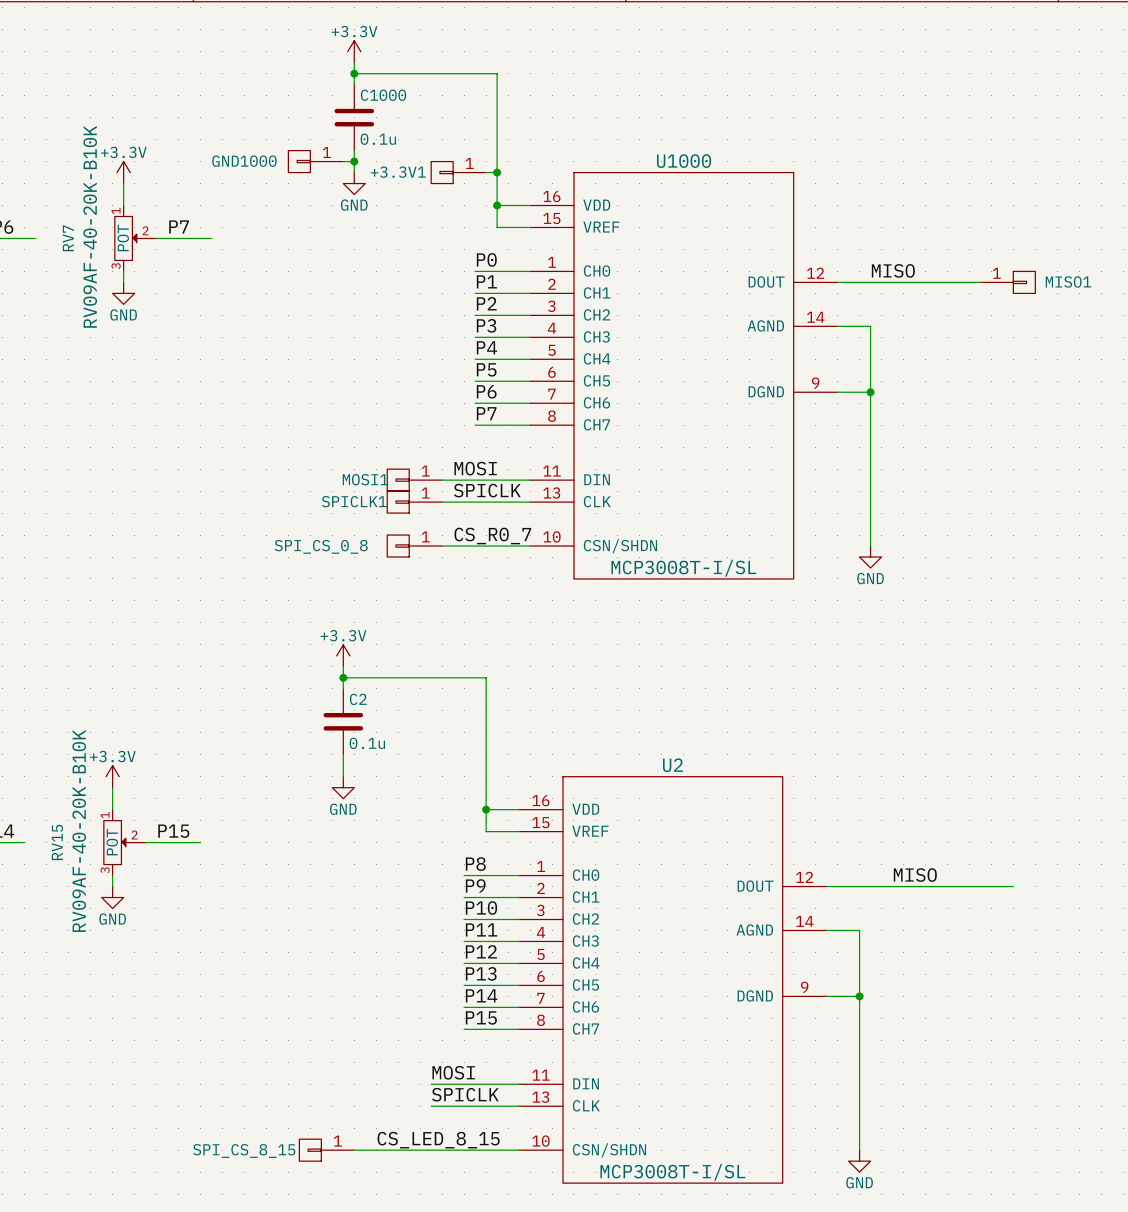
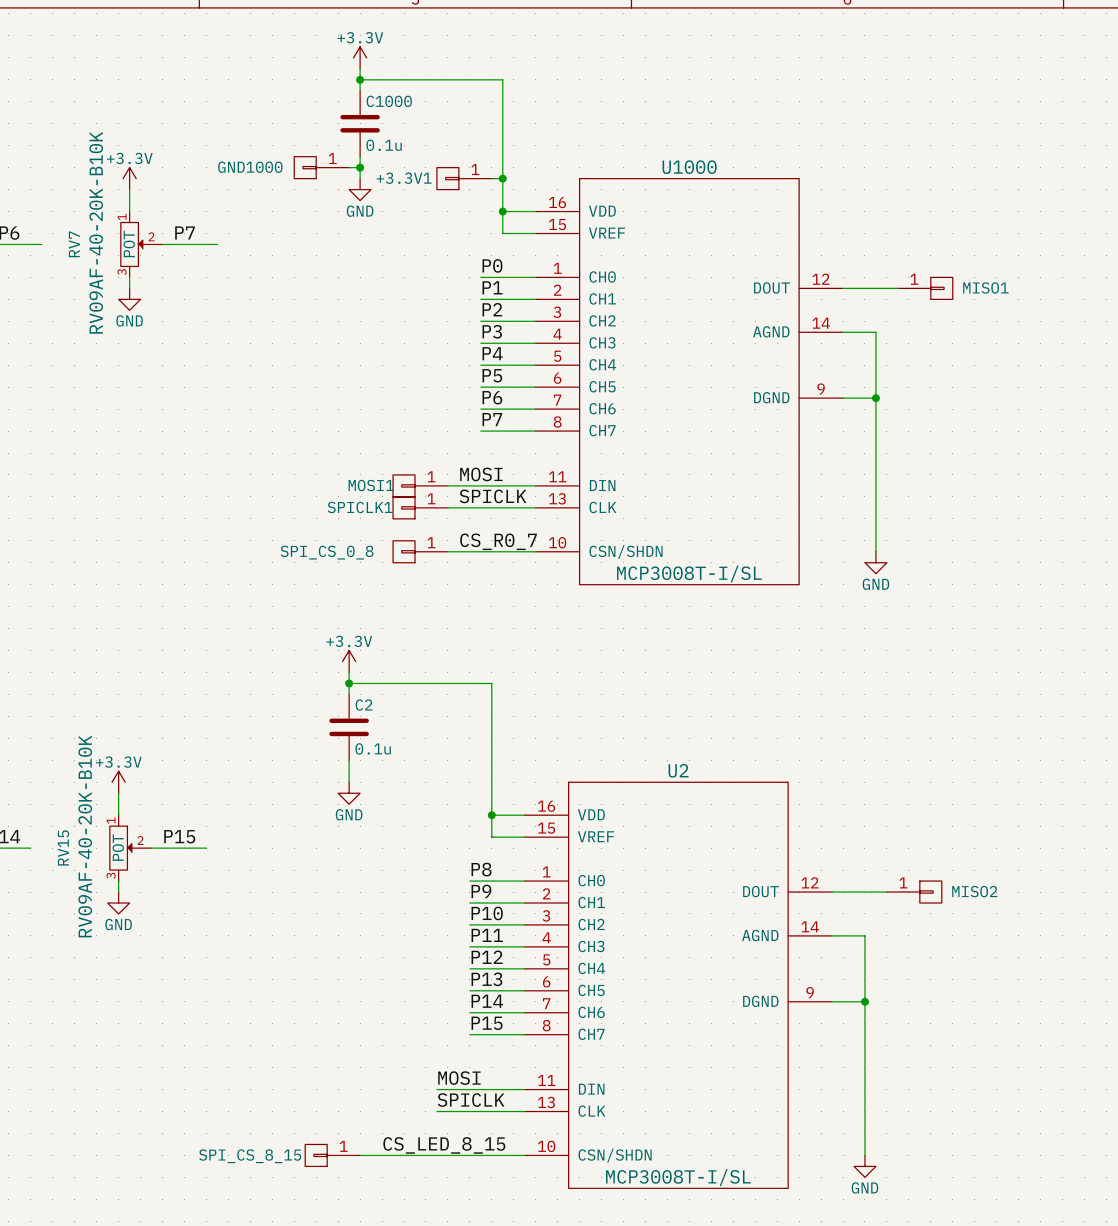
label: MISO (893, 270) -> none
wire: (892, 282) (980, 282) -> none
MISO1 position: (1007, 282) -> (925, 288)
label: MISO (915, 875) -> none
wire: (881, 886) (1013, 886) -> none
MISO2: none -> (914, 892)

